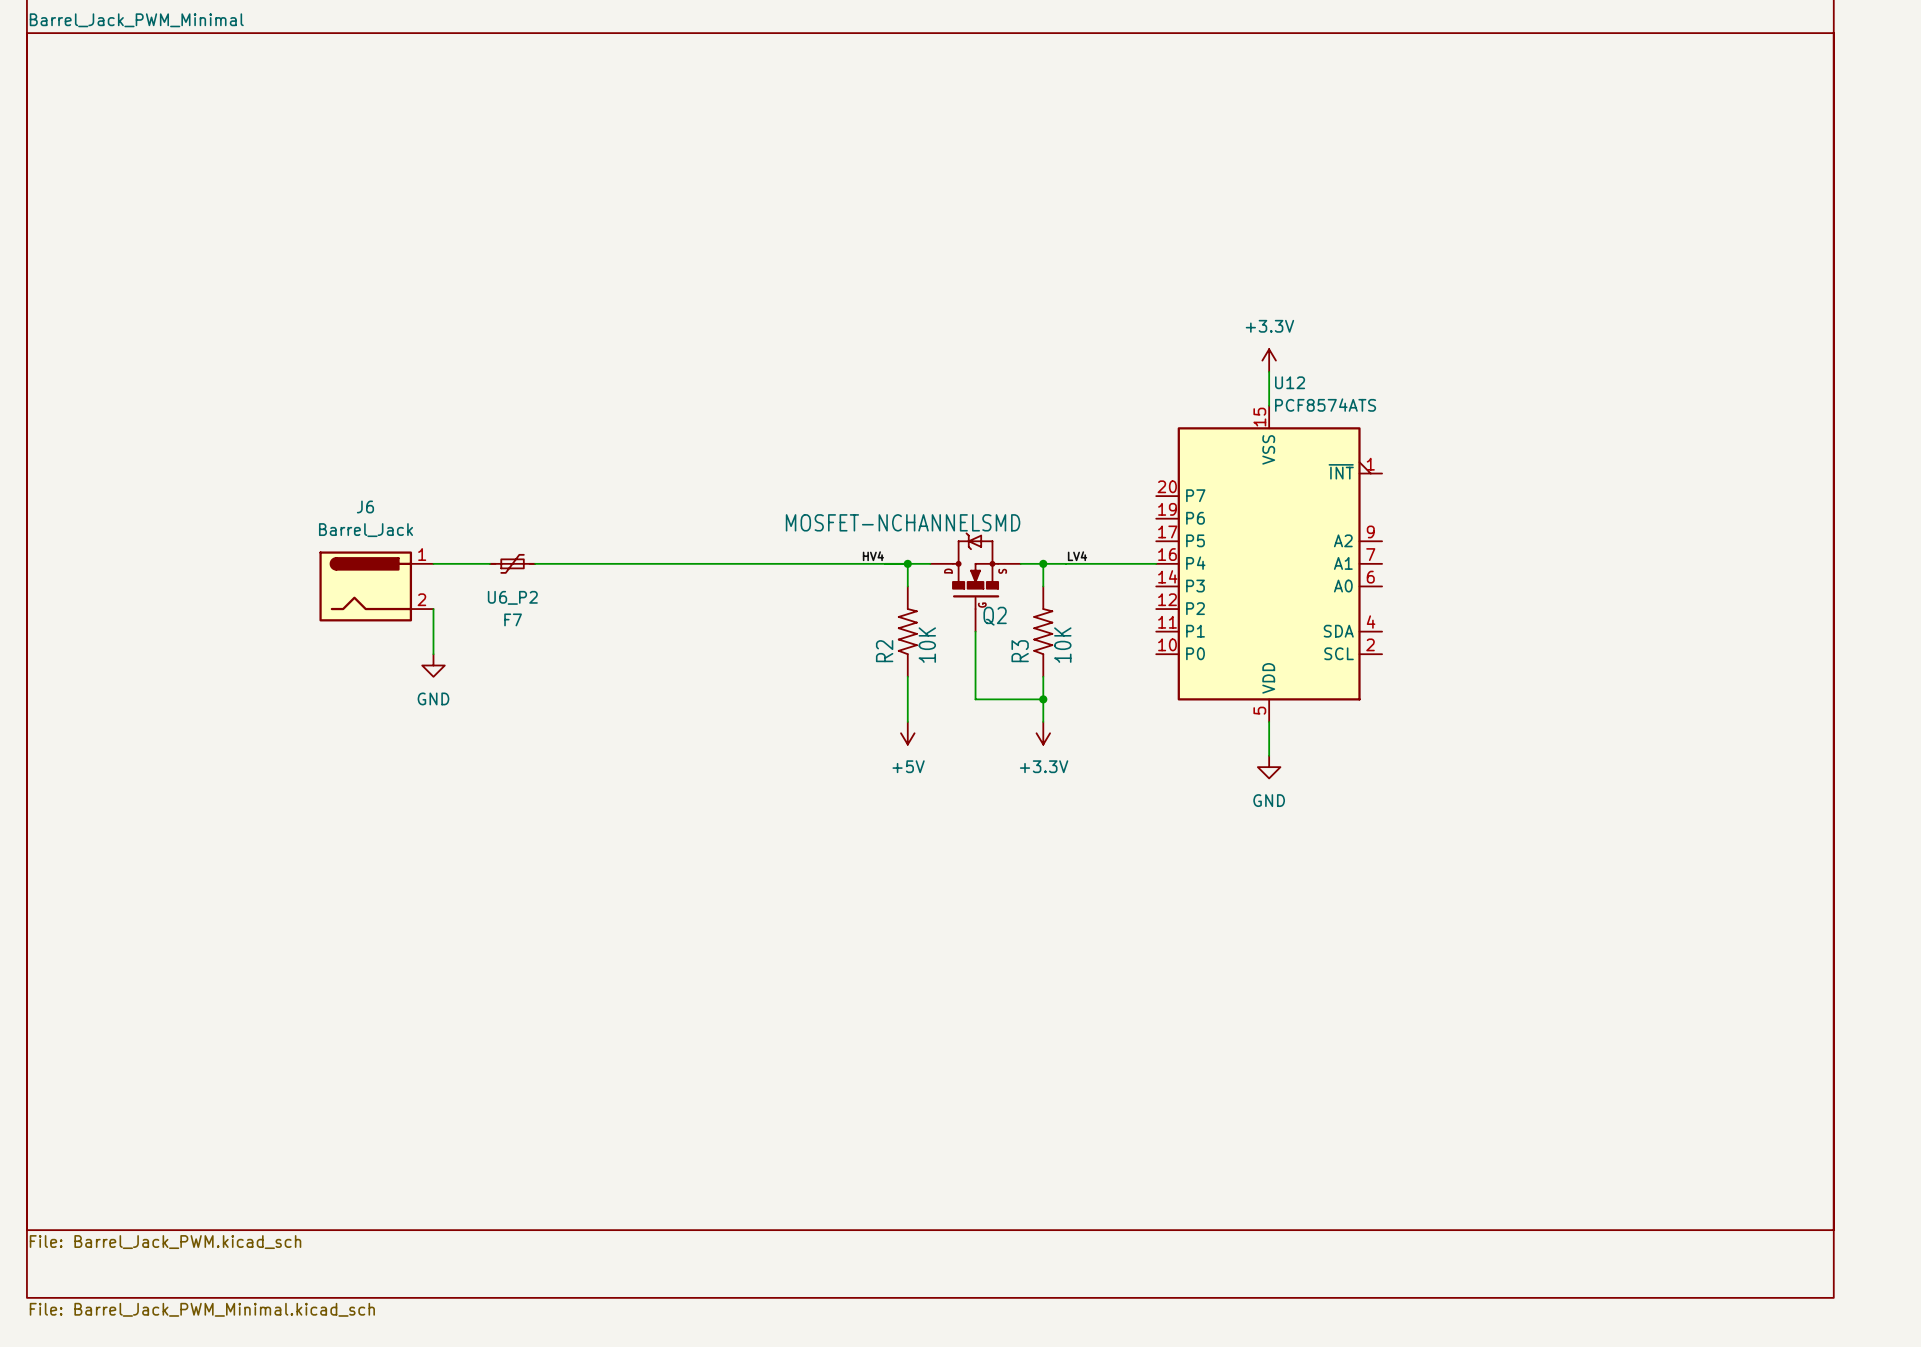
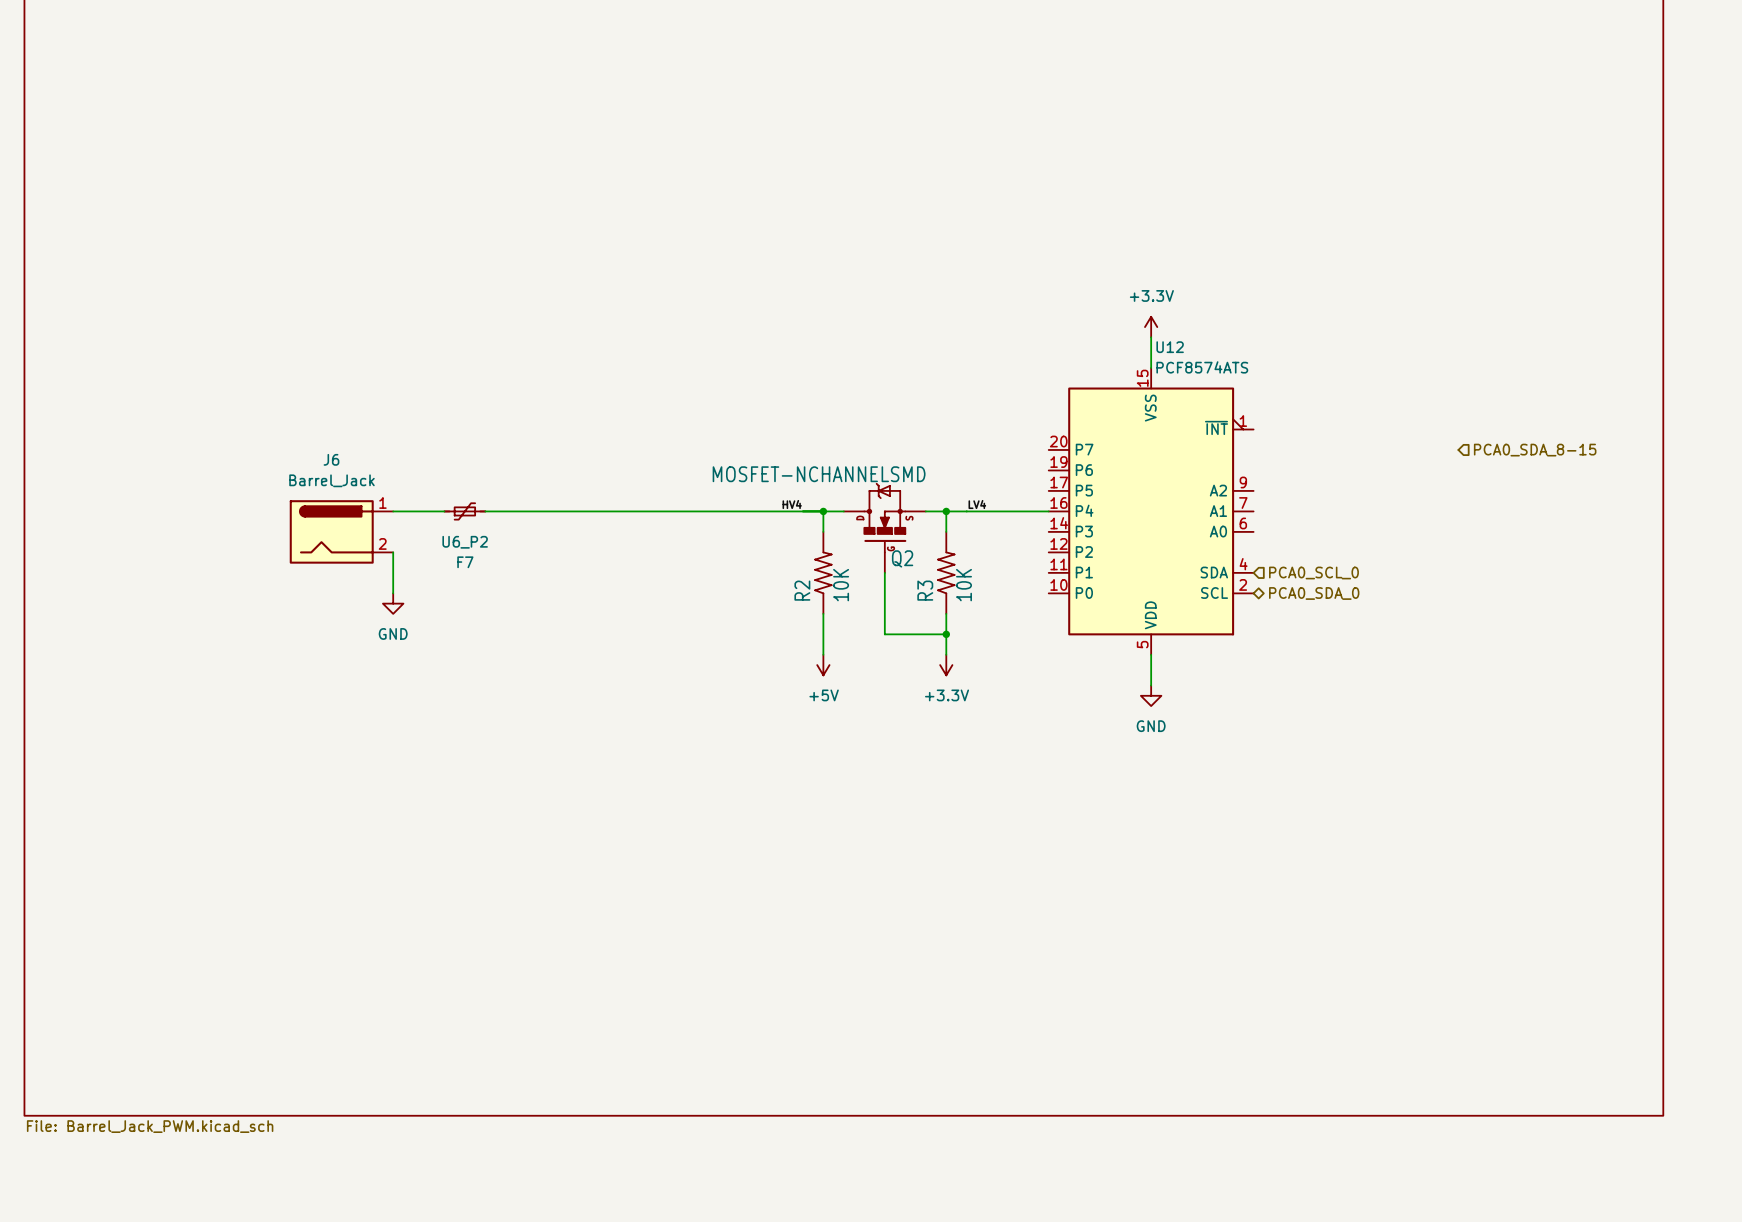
hierarchical label: none -> PCA0_SDA_8-15 (1535, 450)
hierarchical label: none -> PCA0_SCL_0 (1313, 573)
hierarchical label: none -> PCA0_SDA_0 (1314, 593)
sheet Barrel_Jack_PWM_Minimal: File: Barrel_Jack_PWM_Minimal.kicad_sch (930, 665) -> none

